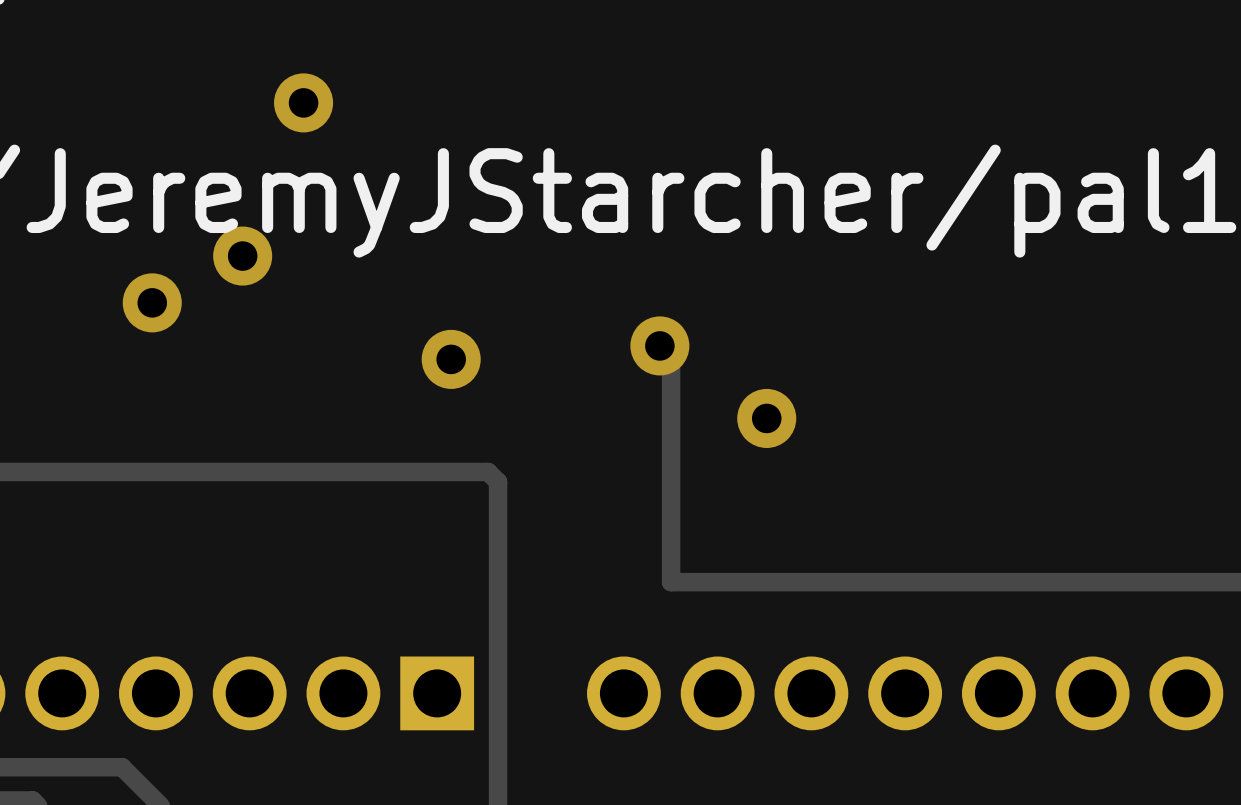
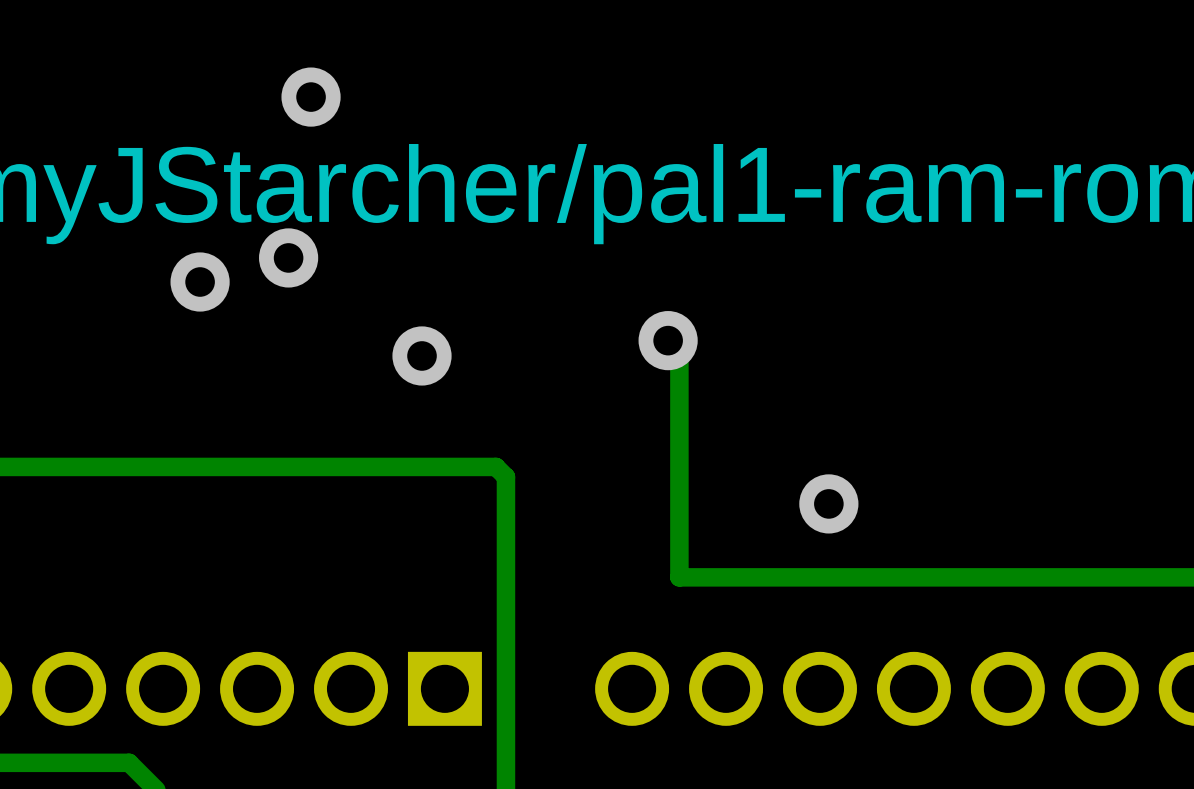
via: (242, 256) -> none
via: none -> (288, 257)
via: none -> (200, 282)
via: (152, 302) -> none
via position: (451, 359) -> (422, 355)
via position: (766, 418) -> (828, 503)

